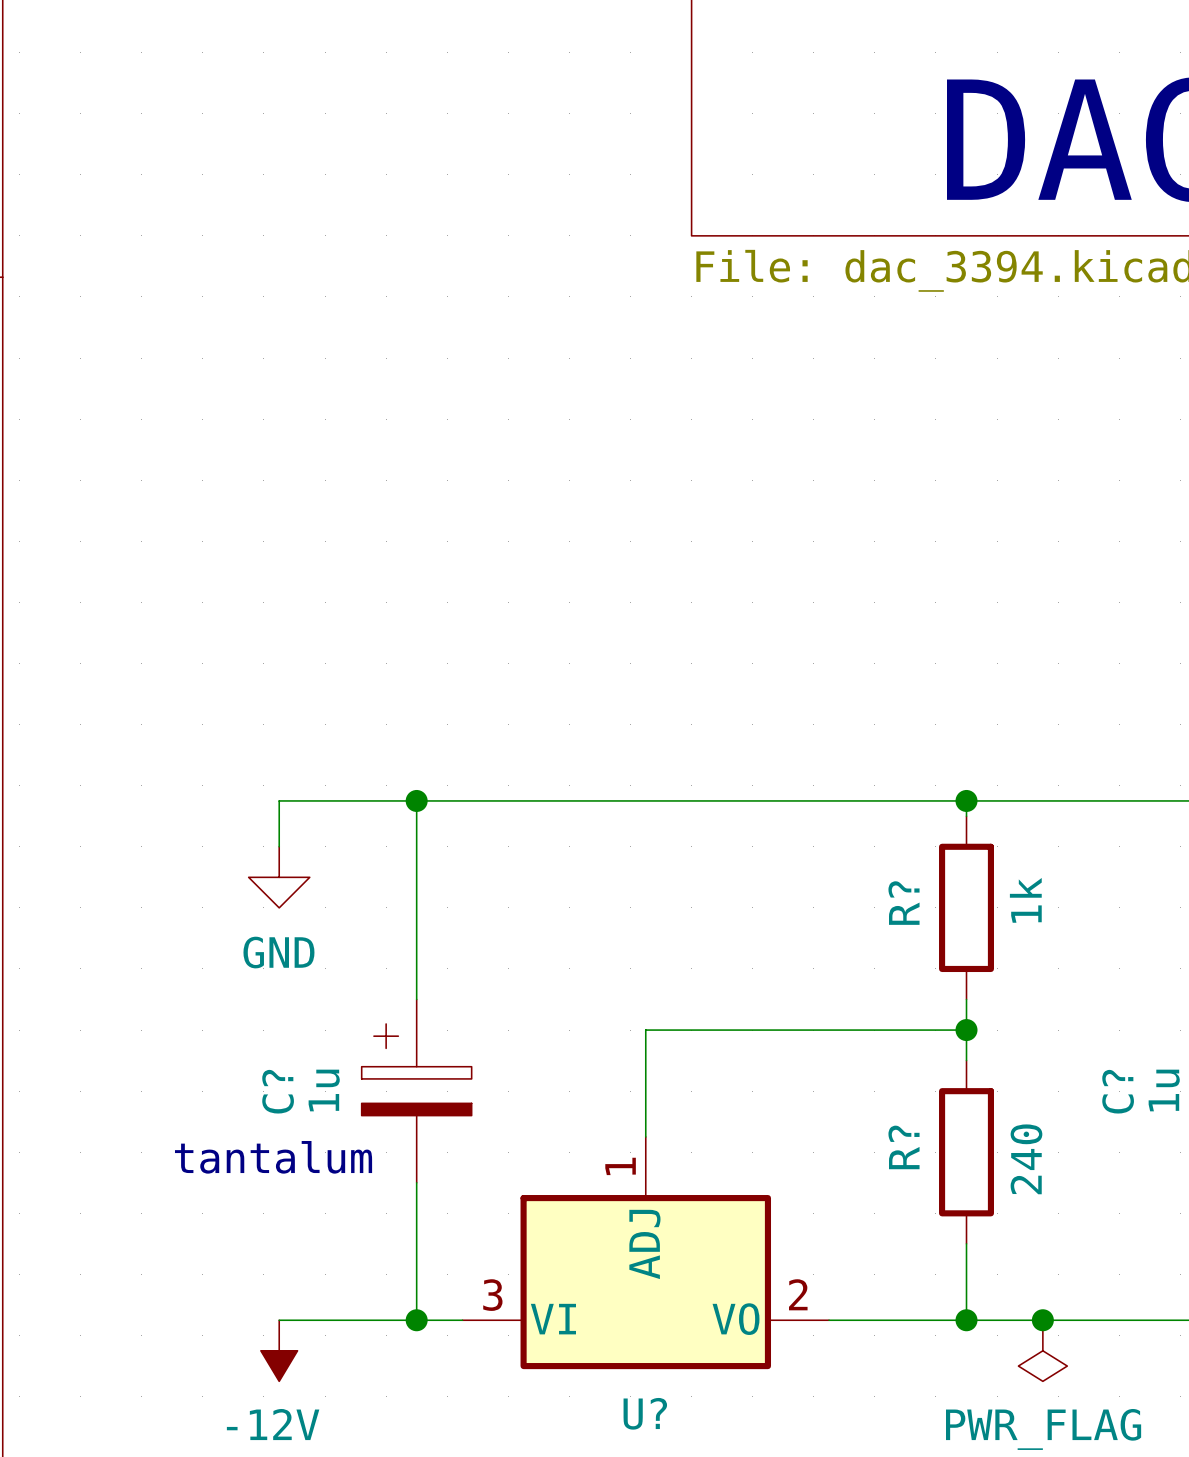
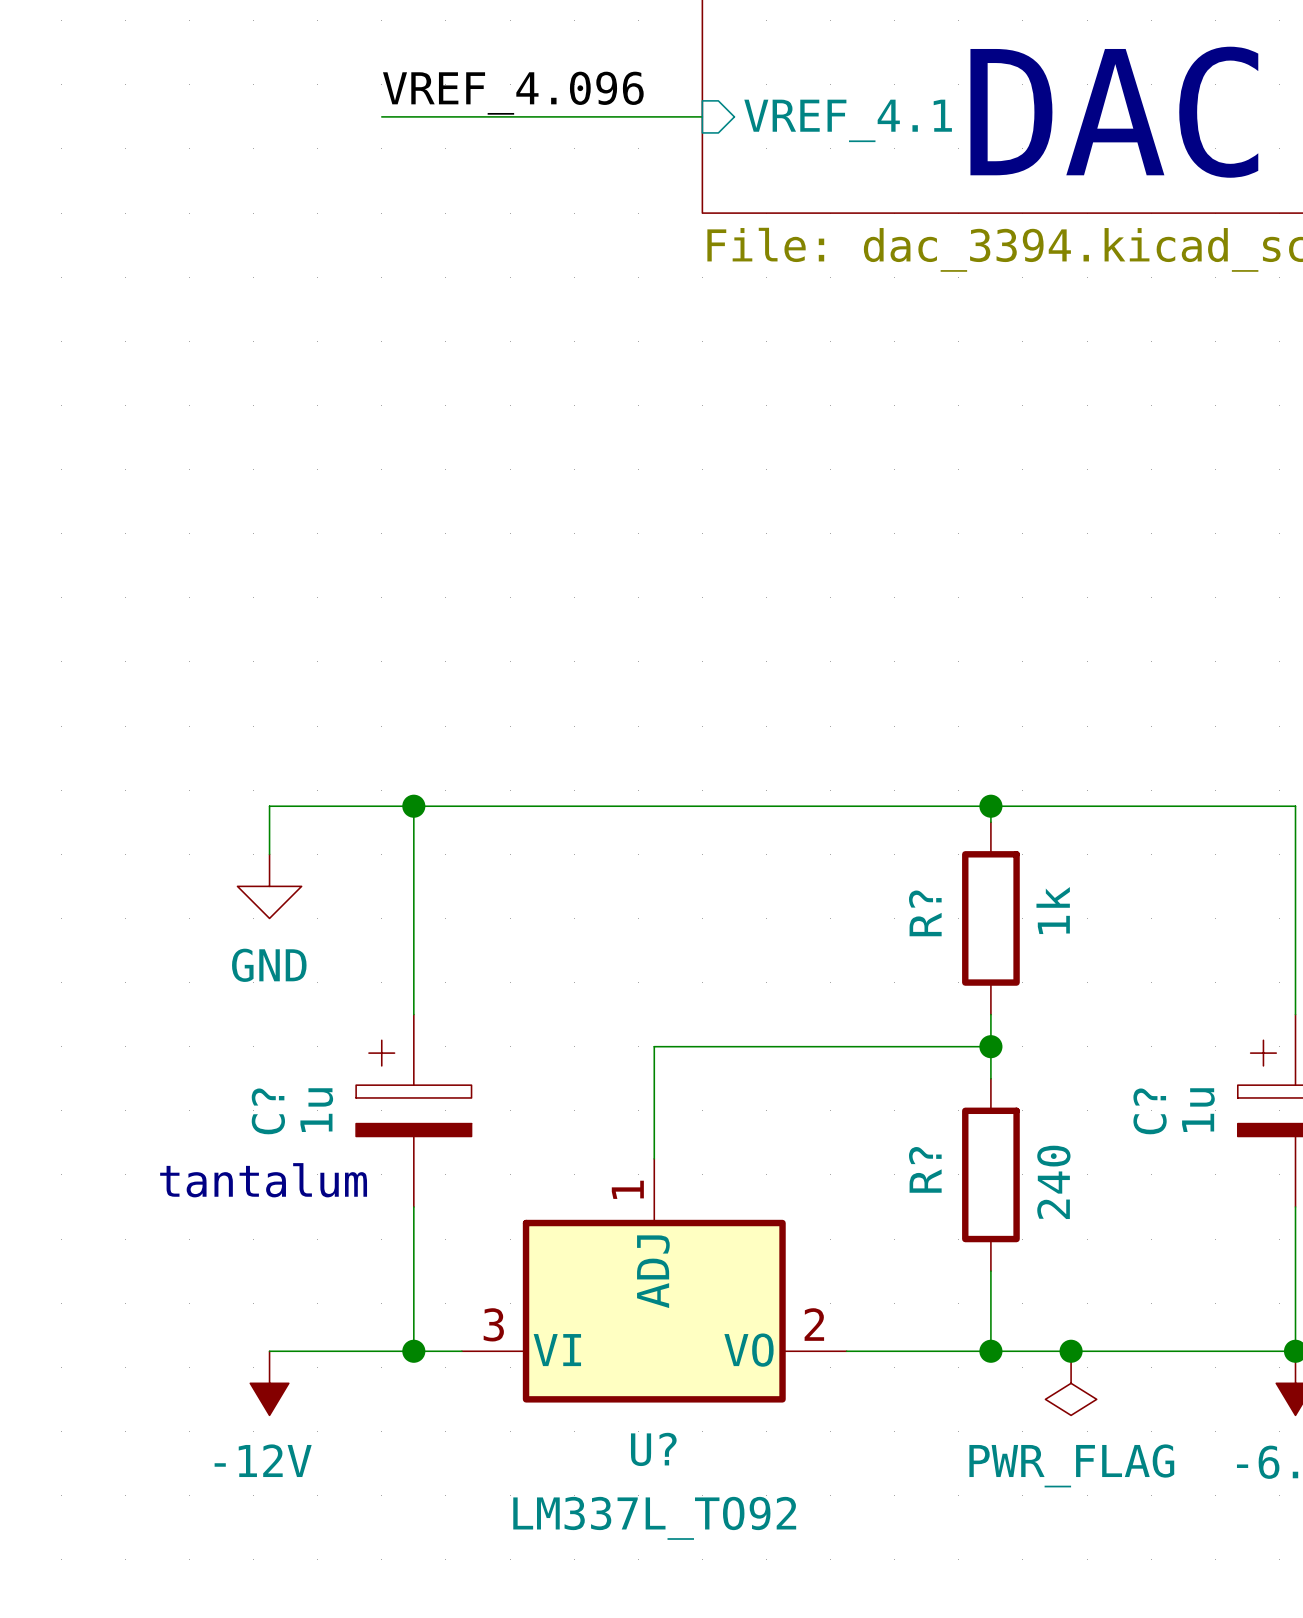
label: none -> VREF_4.096 (513, 93)
wire: none -> (381, 116) (702, 116)
sheet pin: none -> VREF_4.1 (848, 120)

